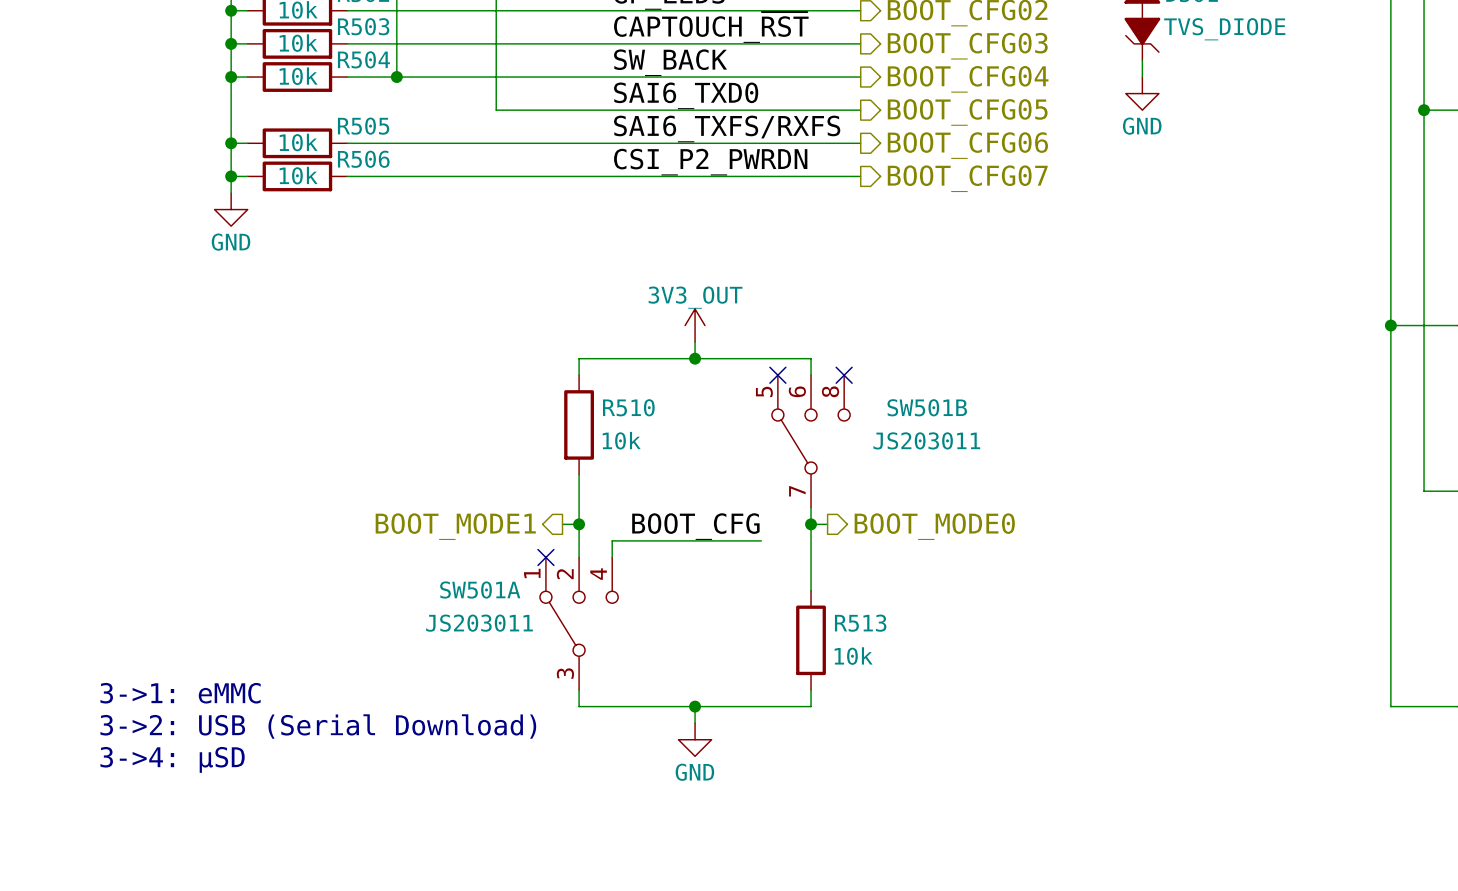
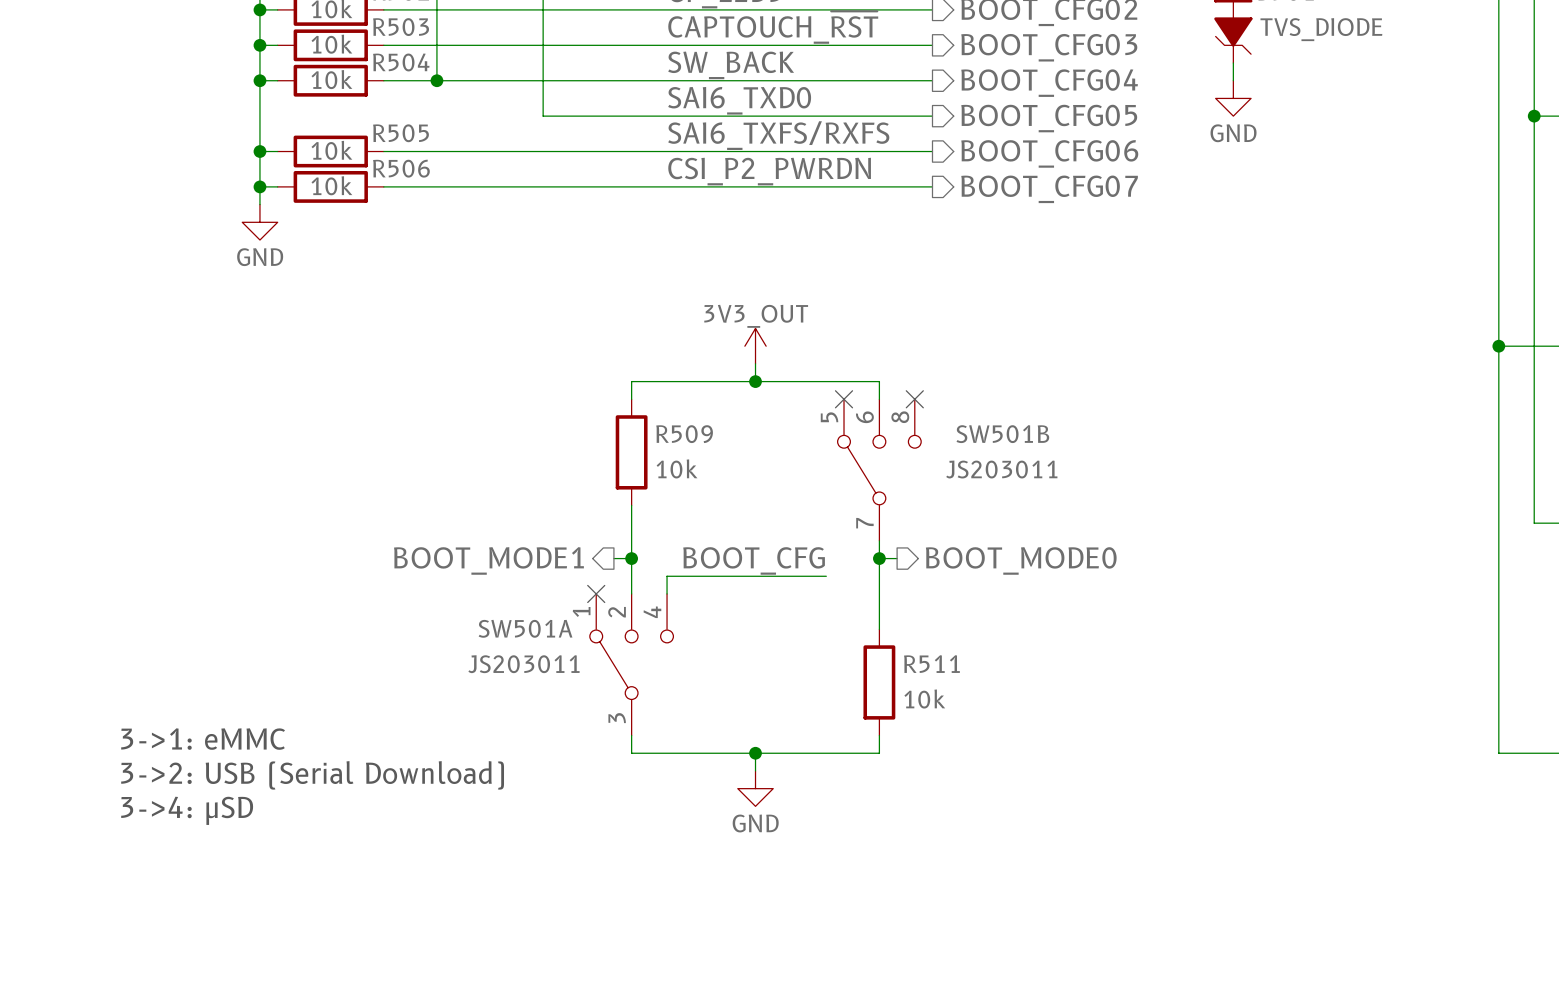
R510 name: R510 (628, 407) -> R509 (684, 434)
R513 name: R513 (860, 623) -> R511 (931, 664)

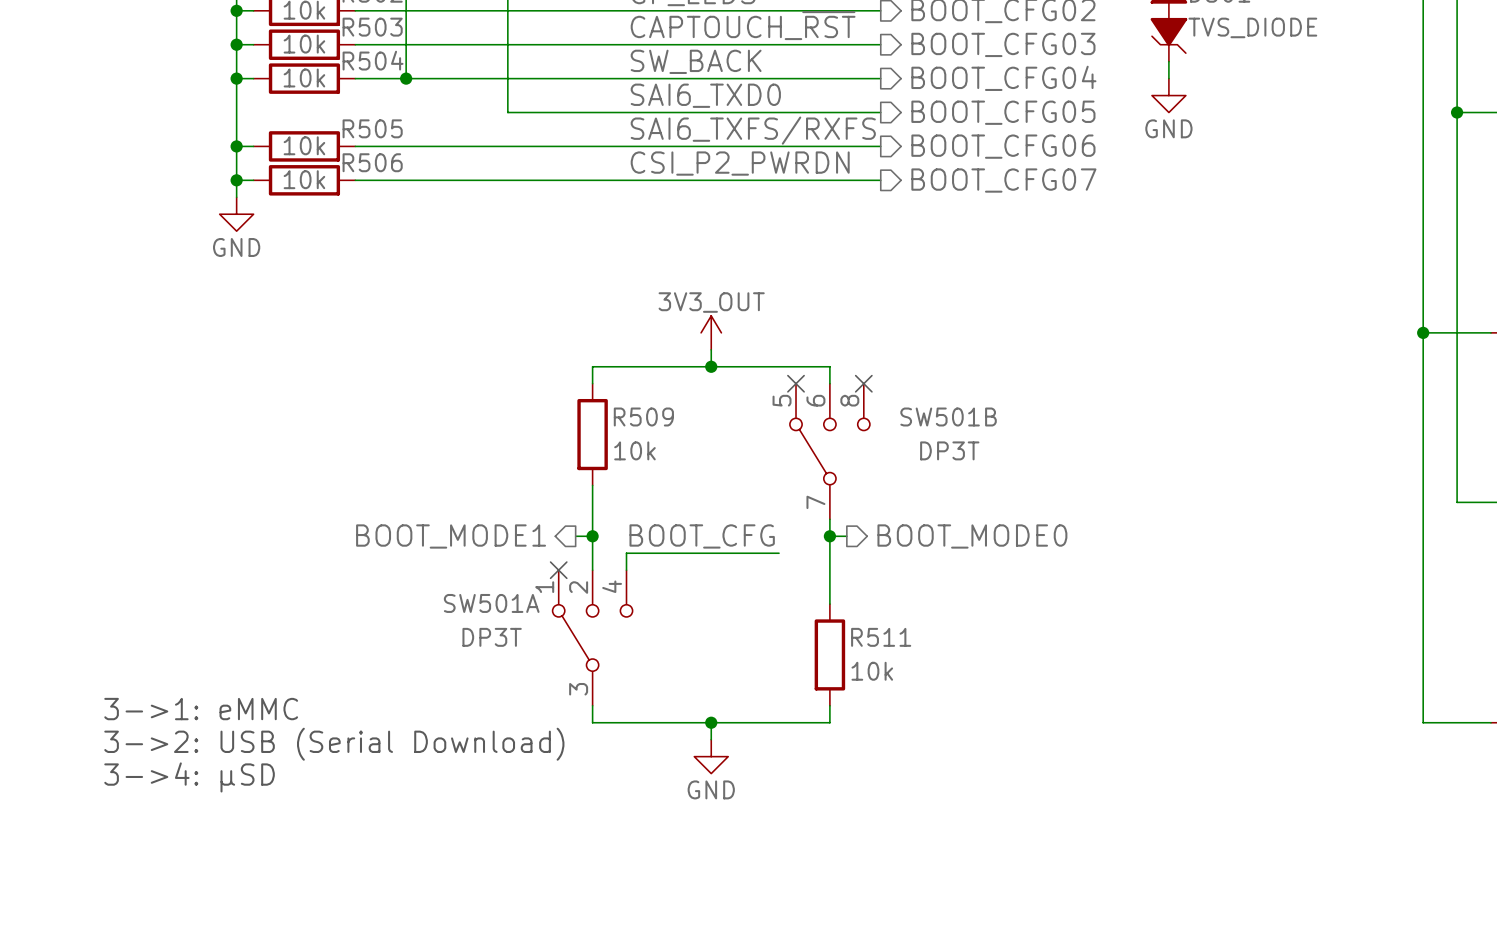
SW501B value: JS203011 (1001, 469) -> DP3T (949, 450)
SW501A value: JS203011 (523, 664) -> DP3T (492, 637)

